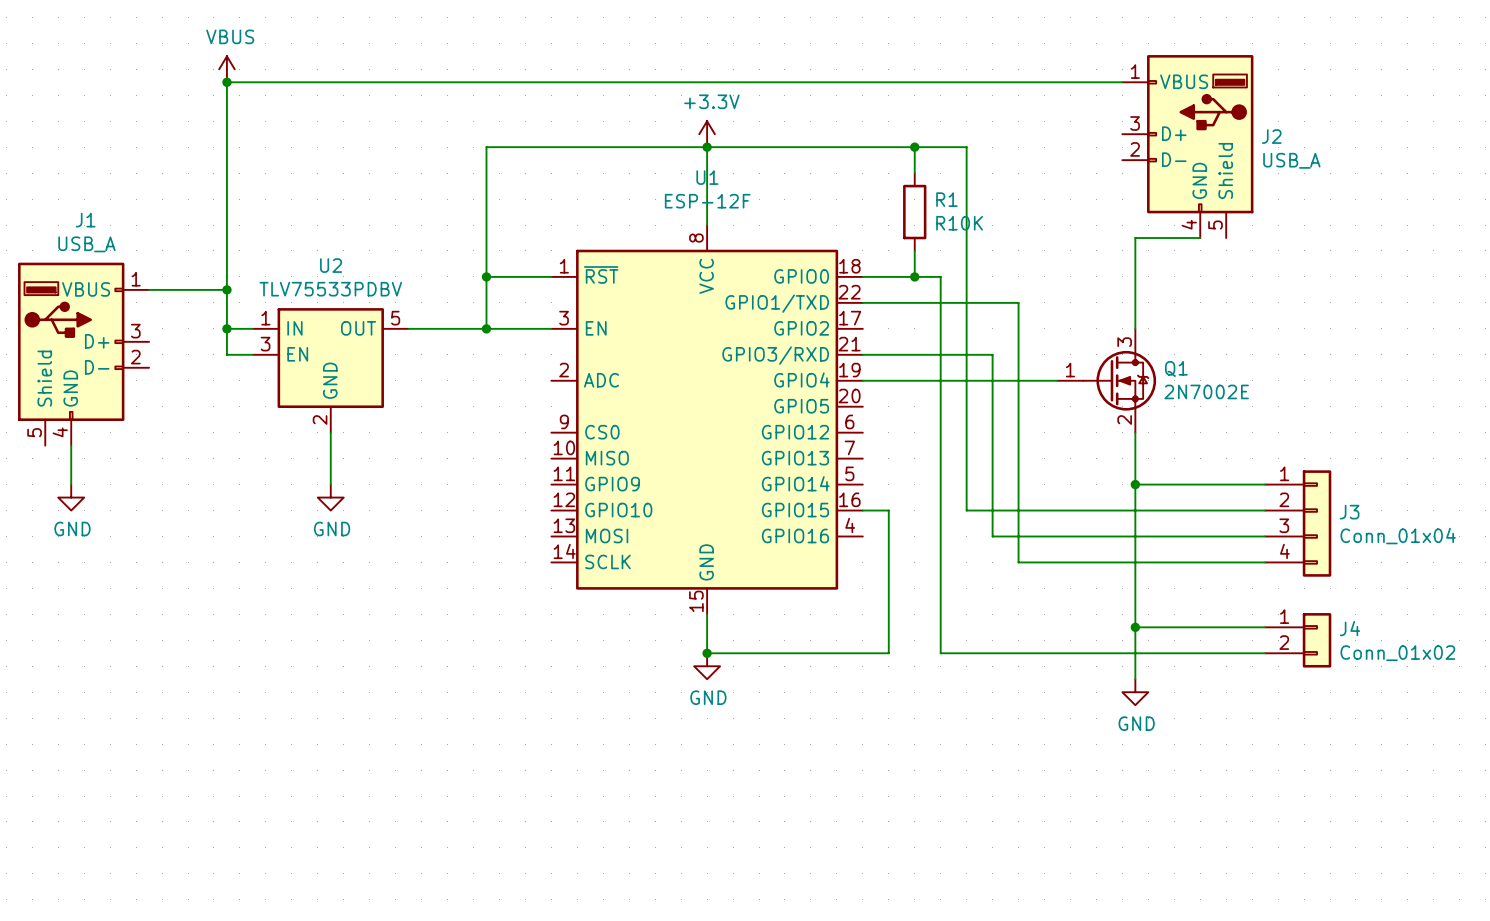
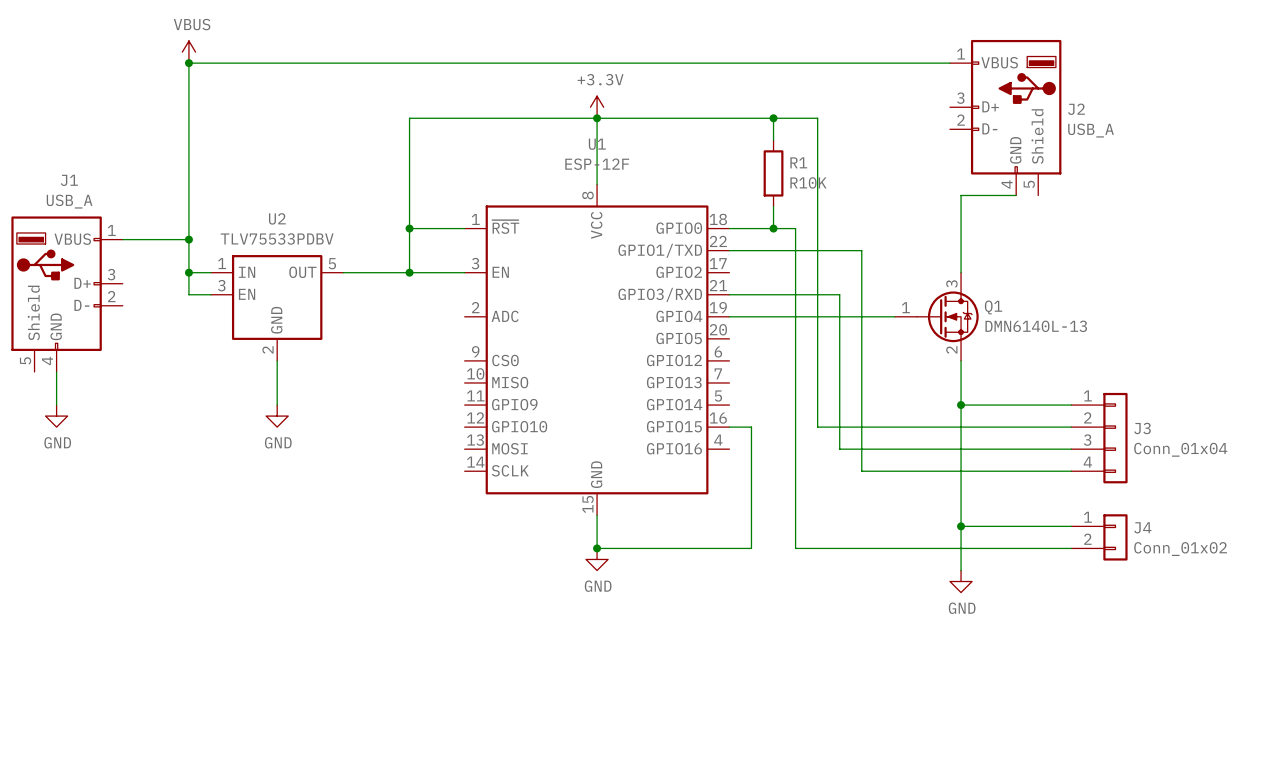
Q1 value: 2N7002E (1206, 391) -> DMN6140L-13 (1036, 326)

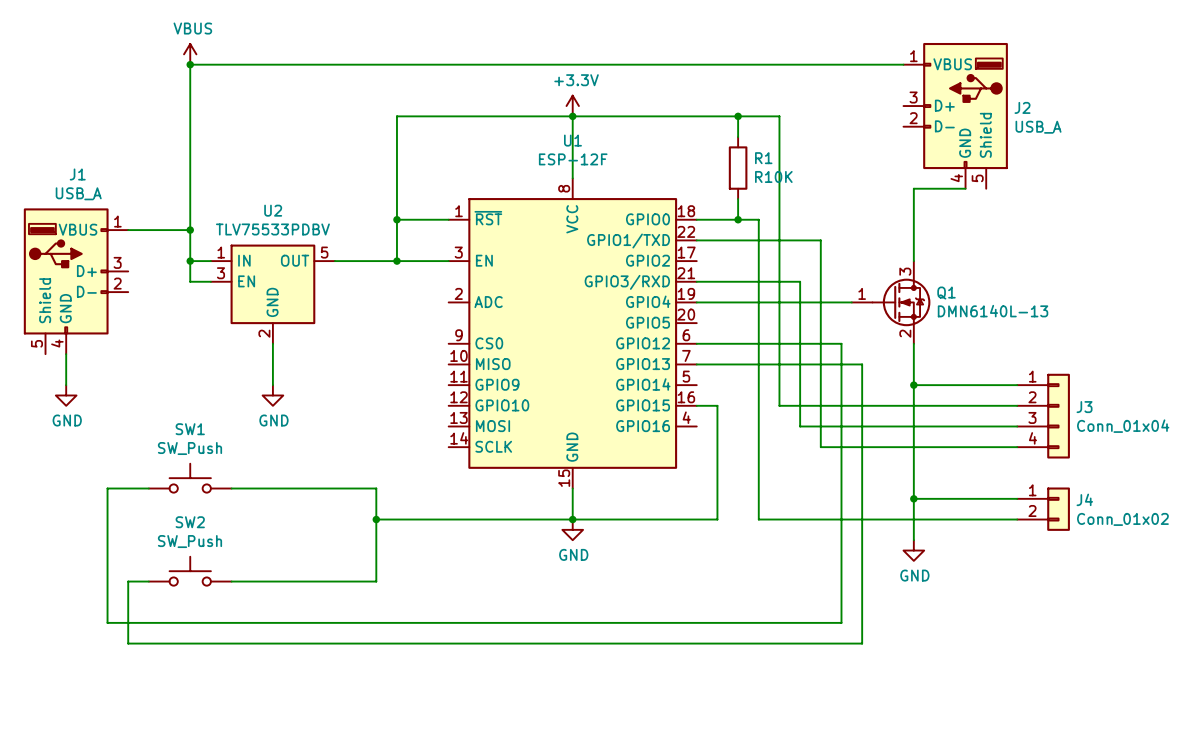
wire: none -> (696, 343) (841, 343) (841, 622) (107, 622) (107, 488) (148, 488)
wire: none -> (696, 364) (862, 364) (862, 643) (128, 643) (128, 581) (148, 581)
SW1: none -> SW_Push (190, 478)
wire: none -> (231, 488) (376, 488) (376, 581) (231, 581)
wire: none -> (376, 519) (572, 519)
junction: none -> (376, 519)
SW2: none -> SW_Push (190, 571)

